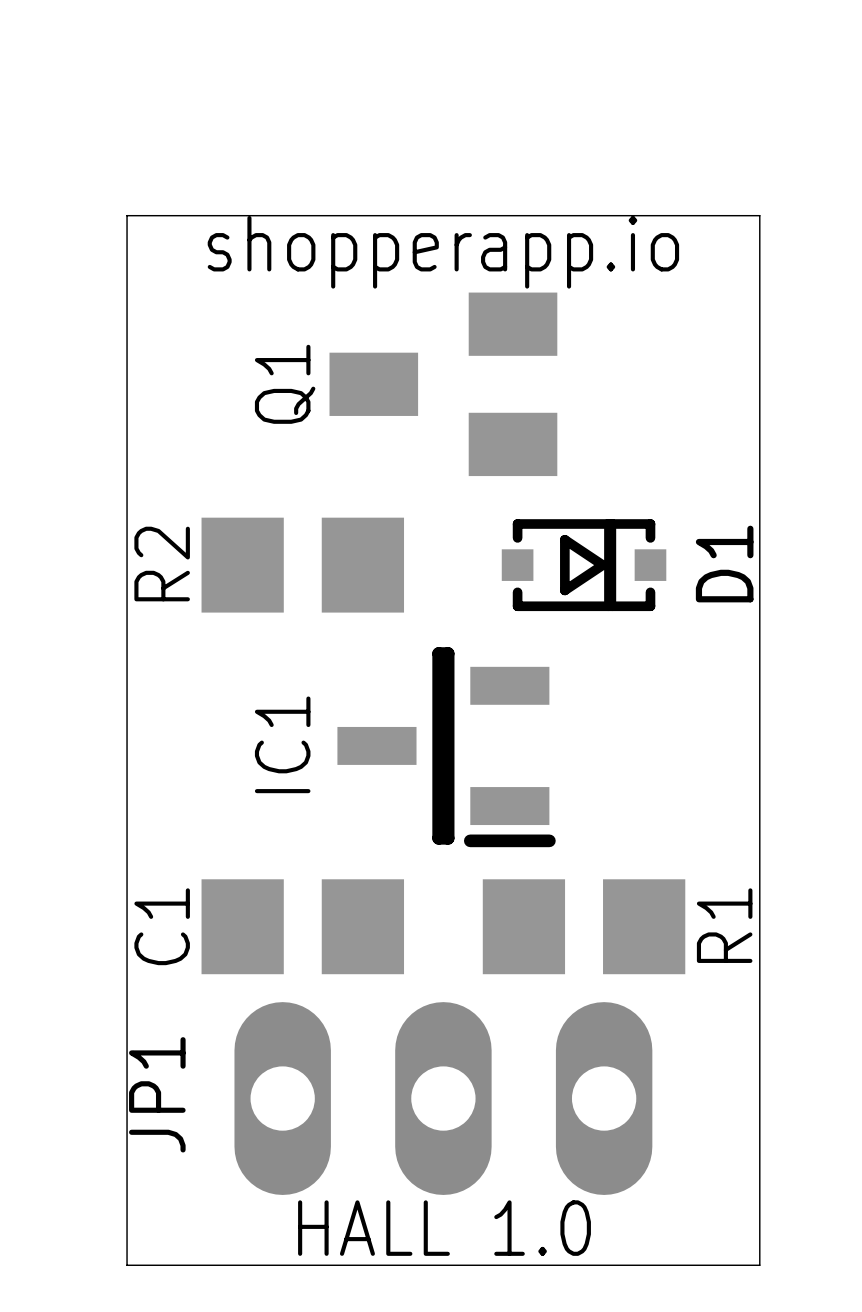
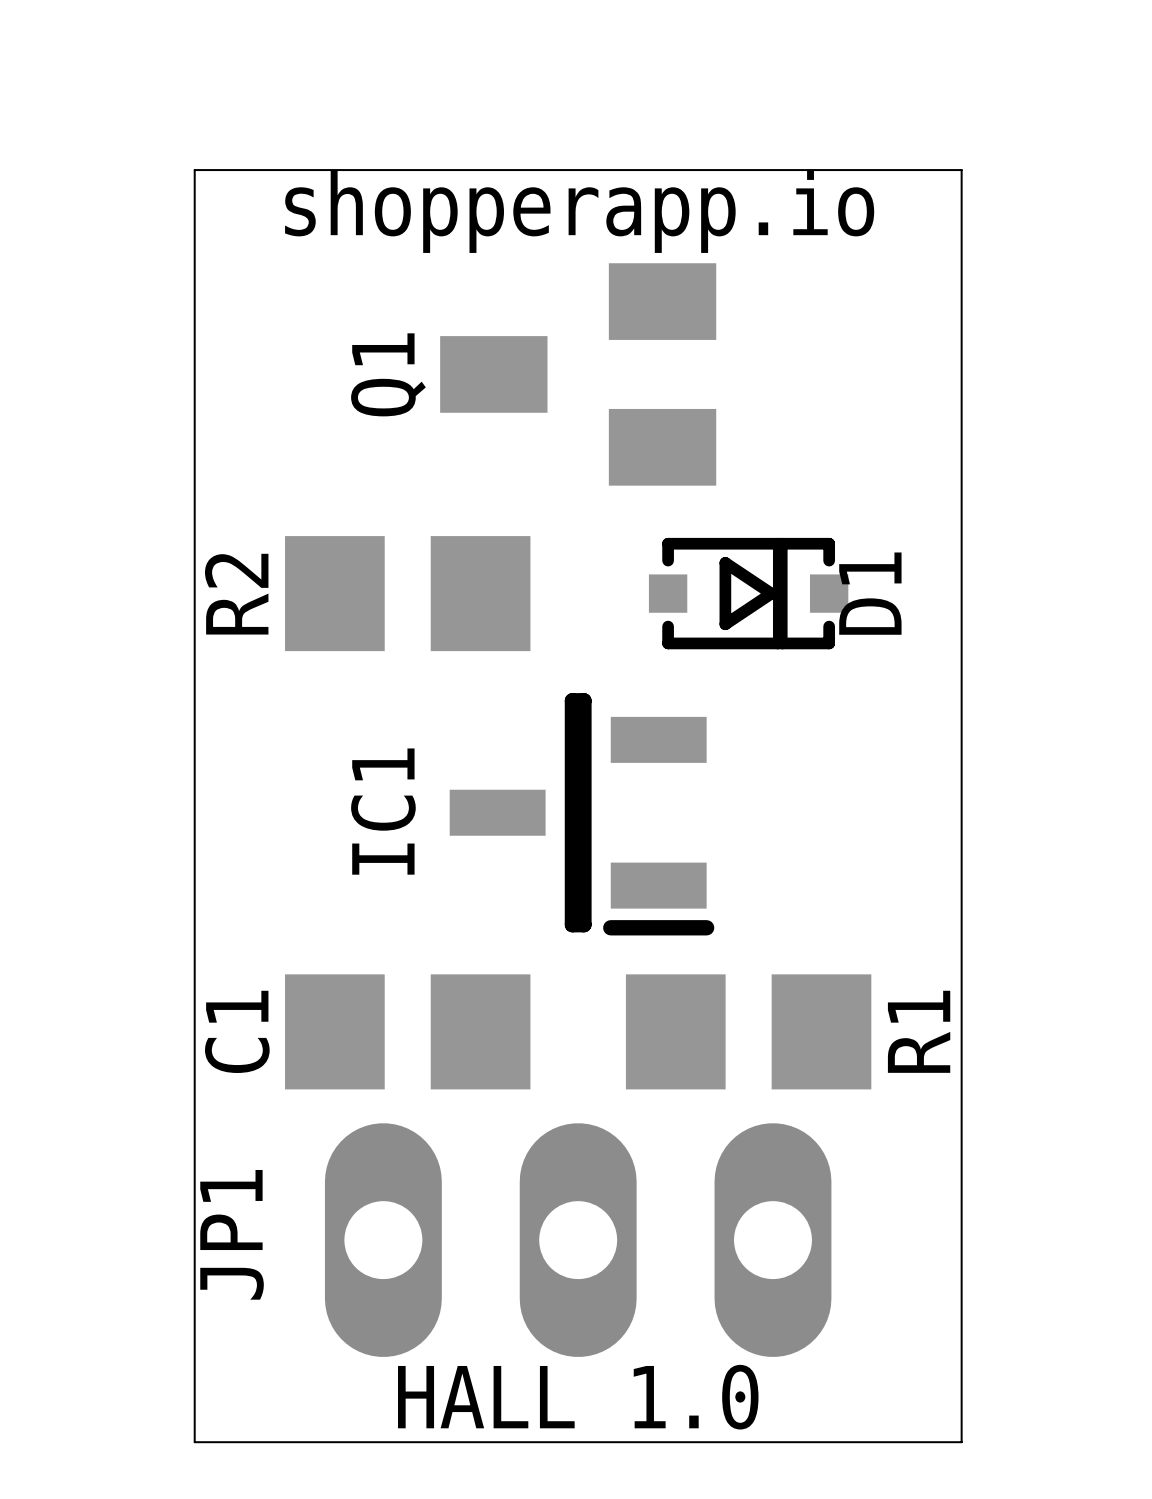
D1 name position: D1 (724, 564) -> D1 (870, 593)

